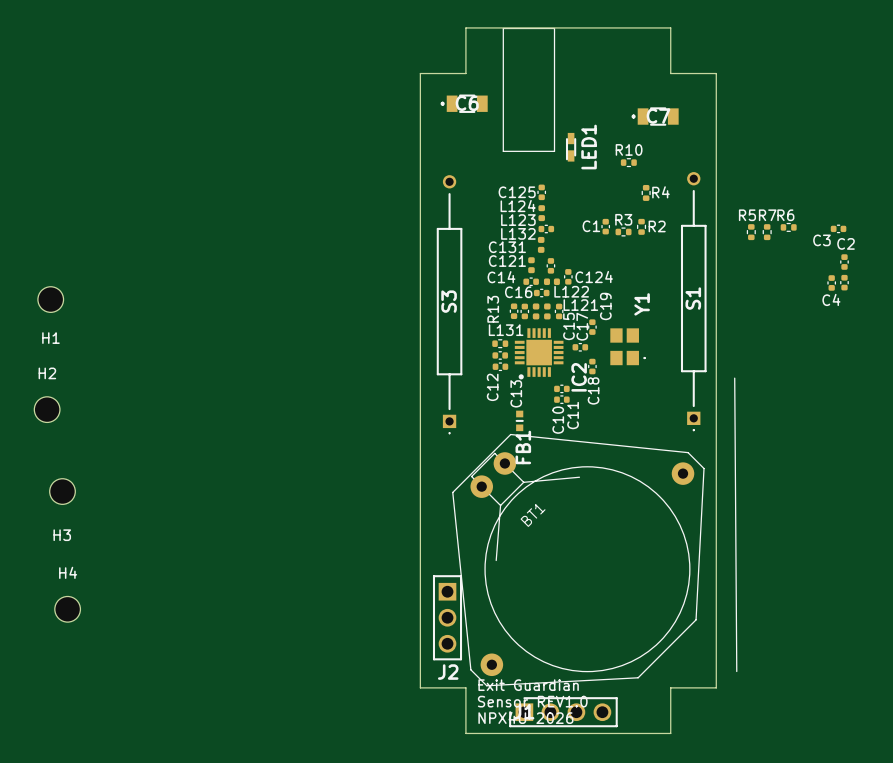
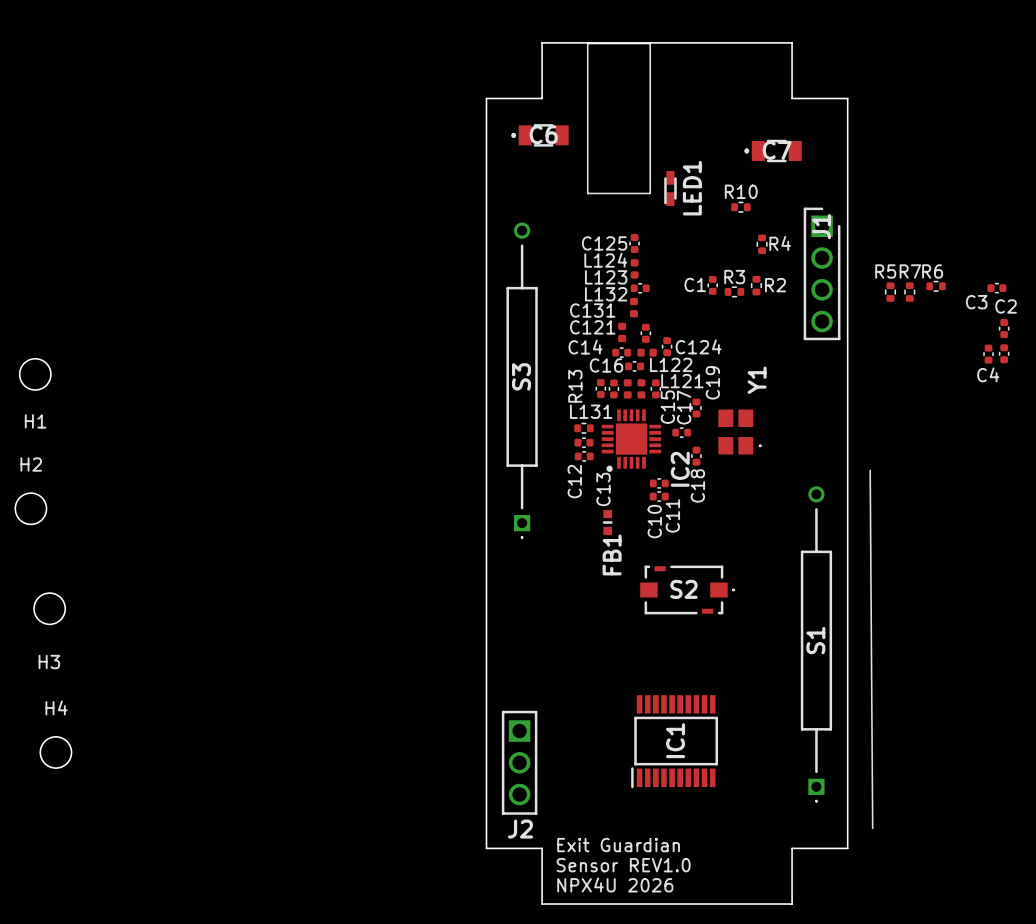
S1 position: (693, 301) -> (816, 644)
S2: none -> (687, 589)
BT1: (578, 560) -> none
IC1: none -> (674, 741)
J1 rotation: 0° (563, 712) -> 90° clockwise (822, 273)
J1 position: (563, 712) -> (822, 273)

